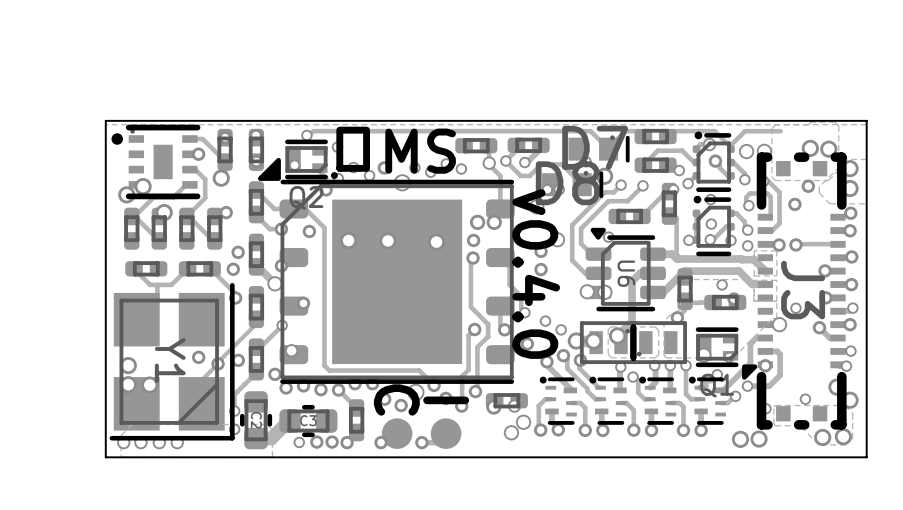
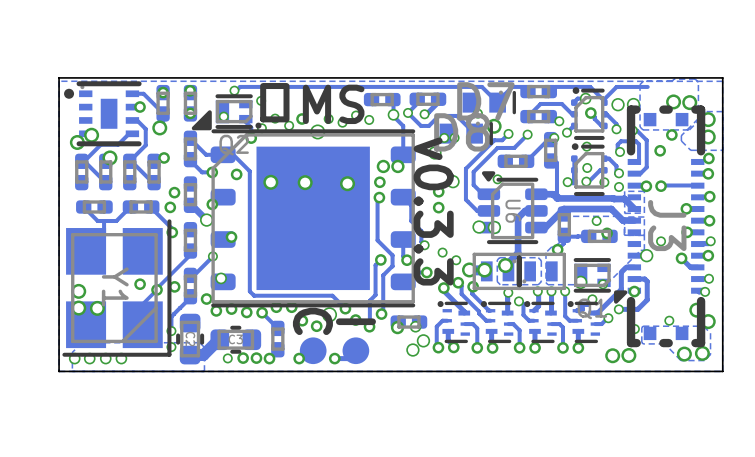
text: v0.4.0 (536, 274) -> v0.3.3 (433, 211)

